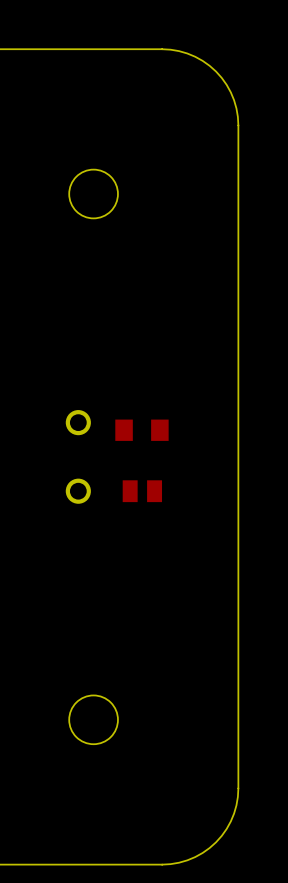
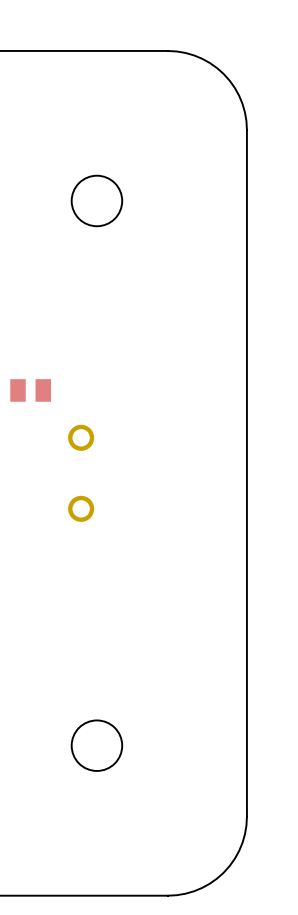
part: (141, 430) -> none
part position: (142, 491) -> (30, 390)

